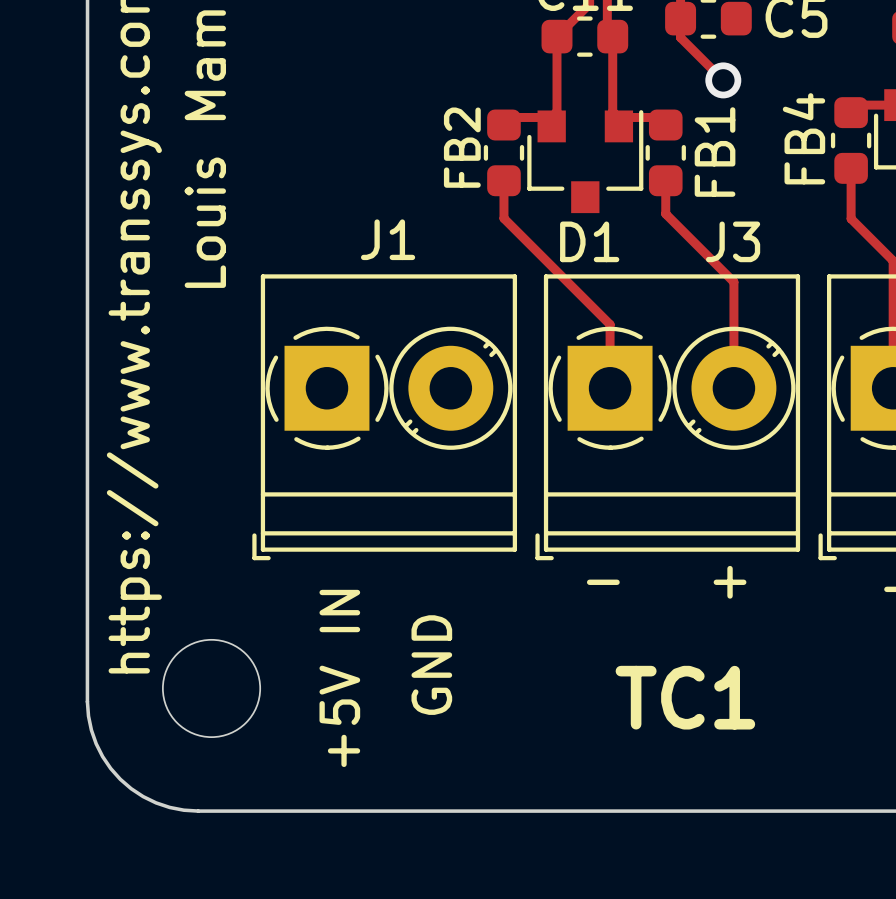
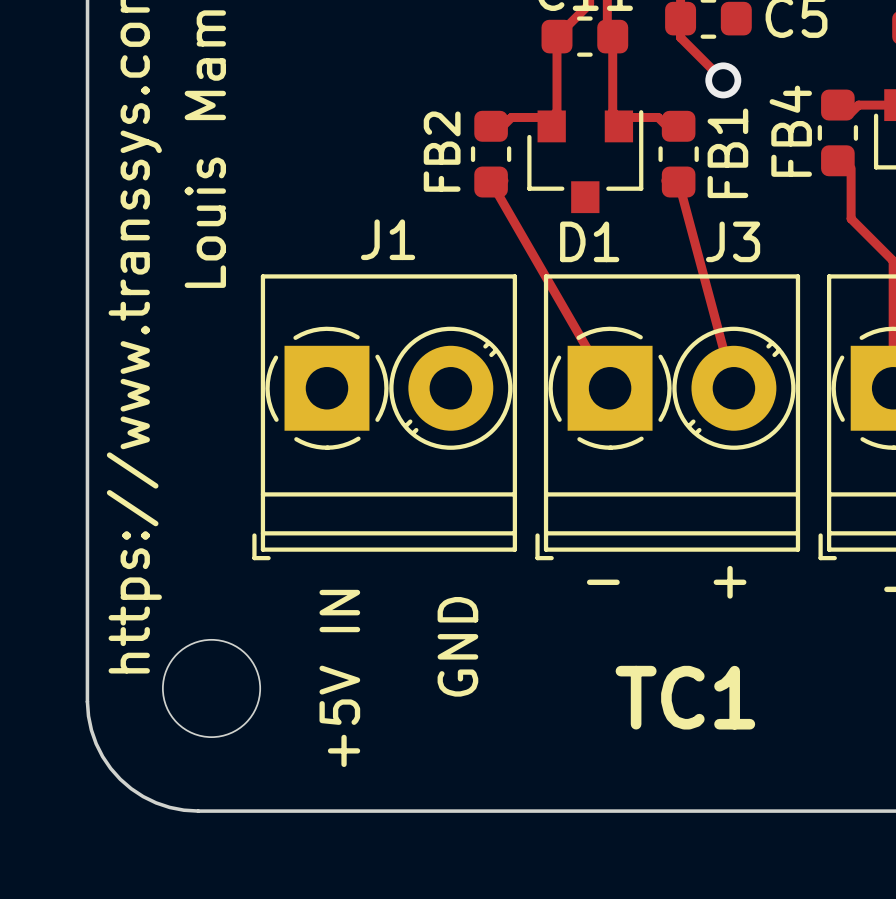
FB4 position: (851, 140) -> (837, 132)
FB2 name position: FB2 (462, 147) -> FB2 (442, 151)
FB2 position: (503, 152) -> (491, 154)
FB1 position: (665, 152) -> (678, 154)
track: (503, 180) (503, 218) (610, 324) (610, 388) -> (491, 182) (610, 388)
track: (665, 180) (665, 213) (733, 282) (733, 388) -> (678, 182) (733, 388)
text position: GND (431, 665) -> GND (457, 646)

